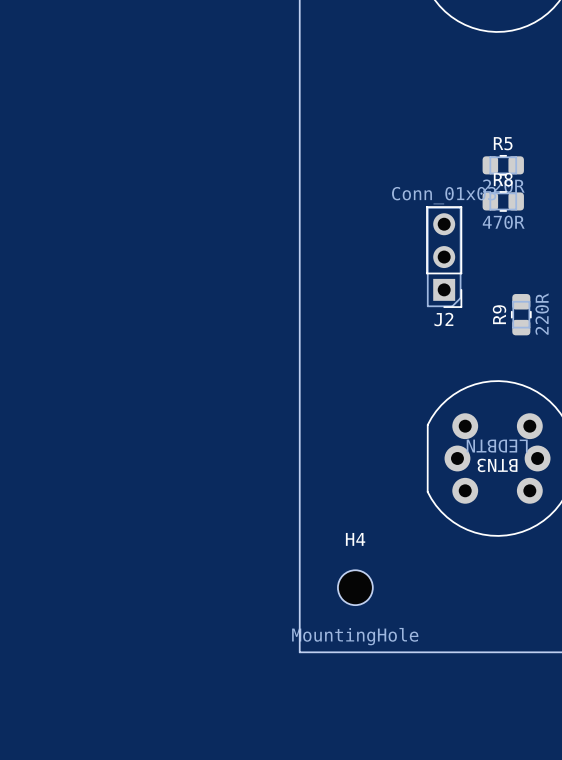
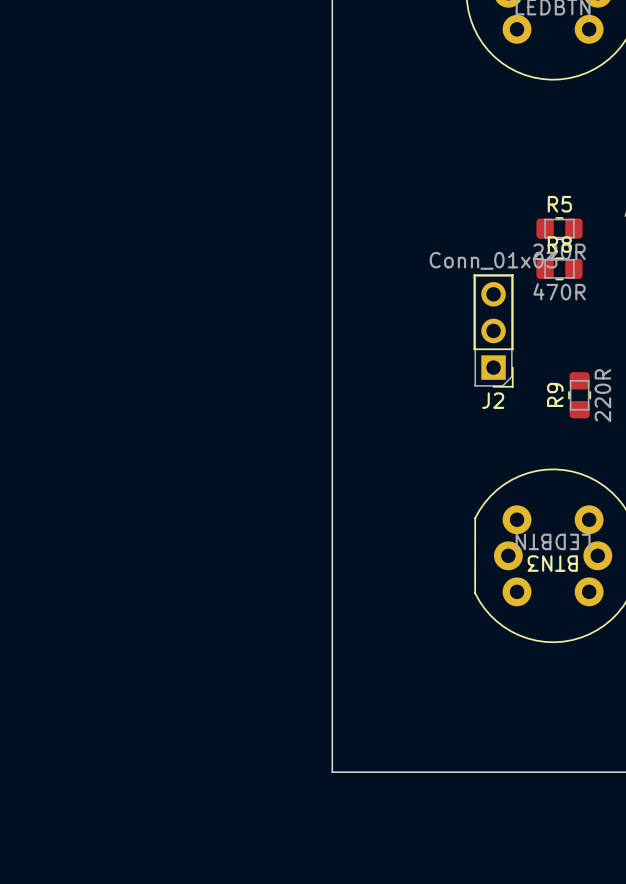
H4: MountingHole (355, 587) -> none

